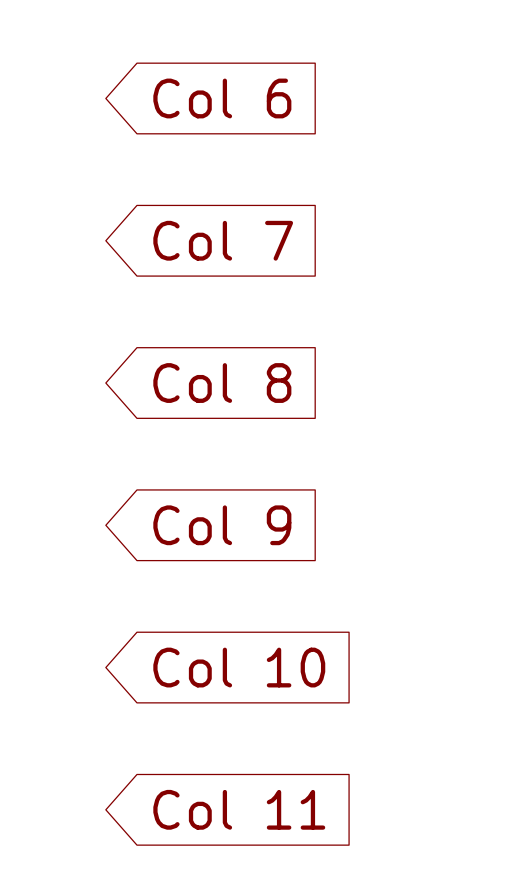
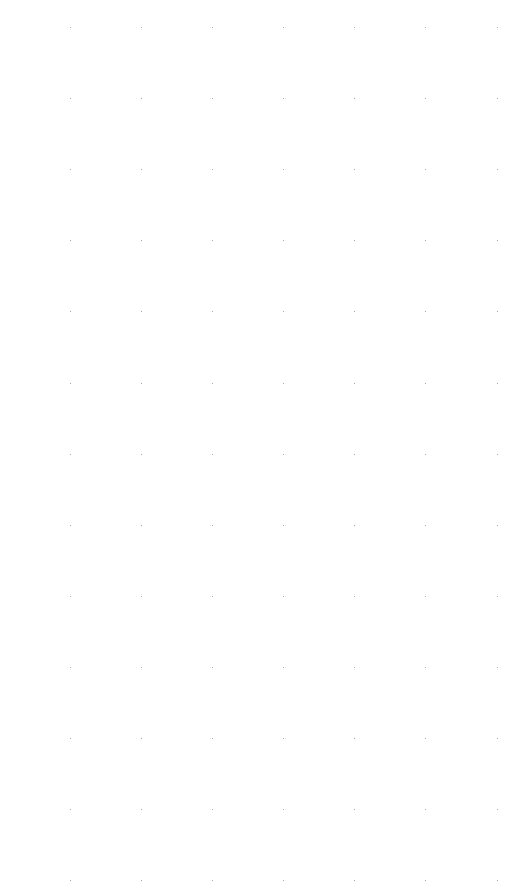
global label: Col 6 (222, 98) -> none
global label: Col 7 (223, 240) -> none
global label: Col 8 (222, 383) -> none
global label: Col 9 (222, 525) -> none
global label: Col 10 (239, 667) -> none
global label: Col 11 (239, 809) -> none

